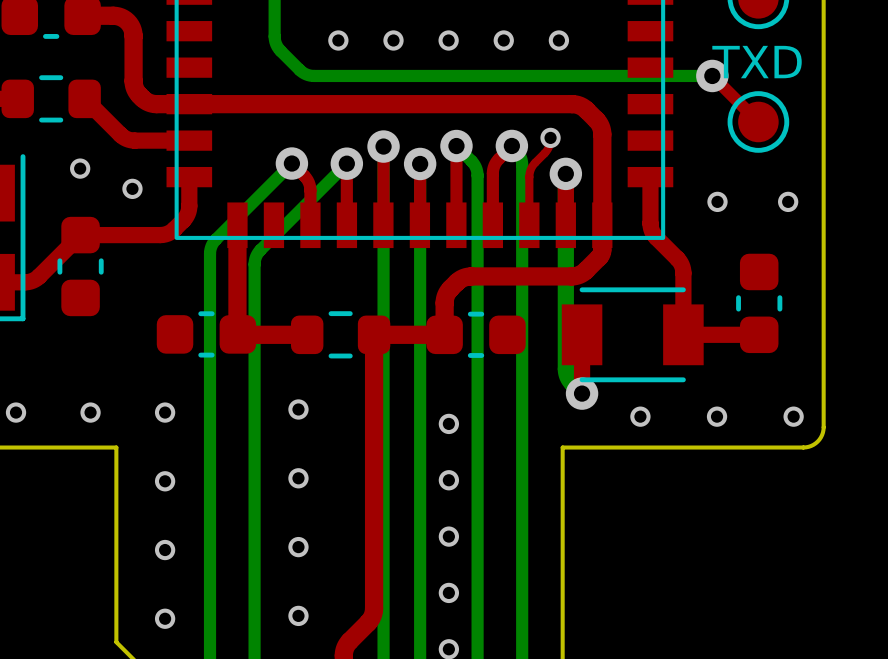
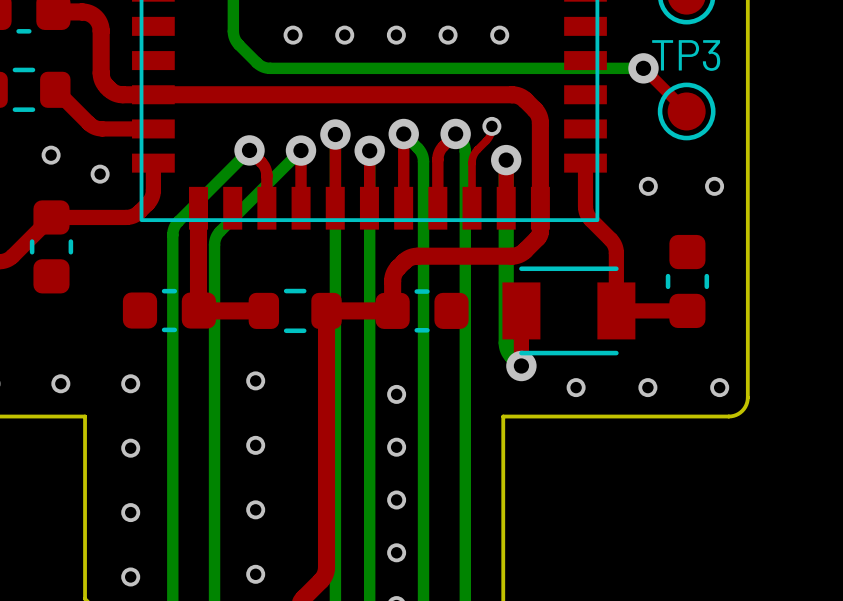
TXD name: TXD (757, 62) -> TP3 (686, 55)

